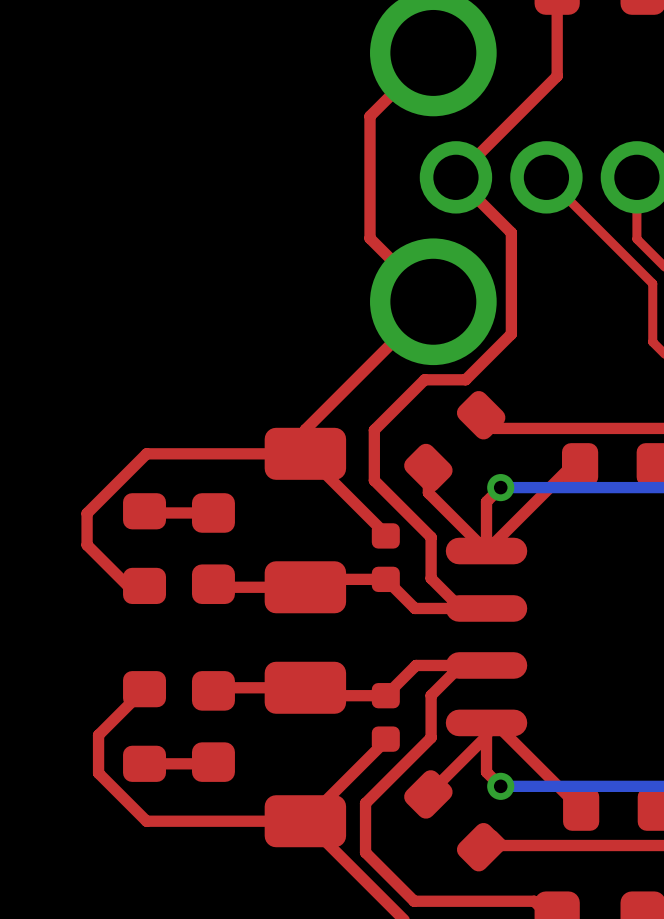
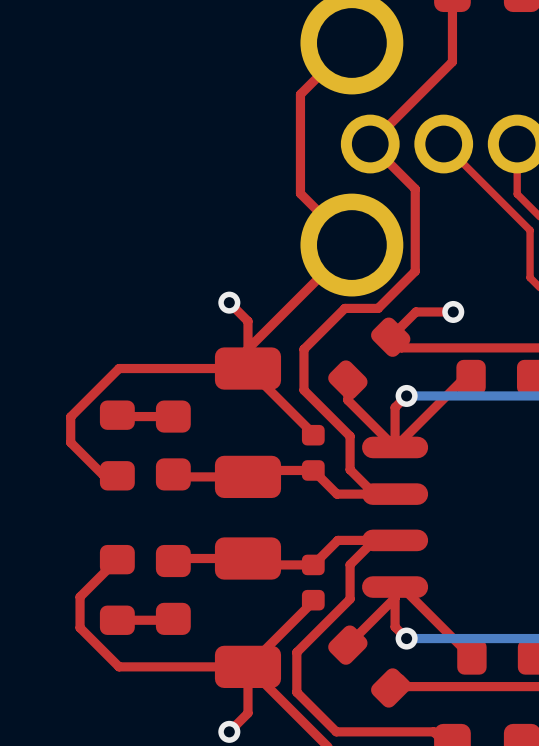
top track: none -> (229, 302) (247, 321) (247, 348)
via: none -> (229, 302)
top track: none -> (453, 311) (415, 311) (390, 337)
via: none -> (453, 311)
top track: none -> (247, 666) (247, 713) (229, 731)
via: none -> (229, 731)

